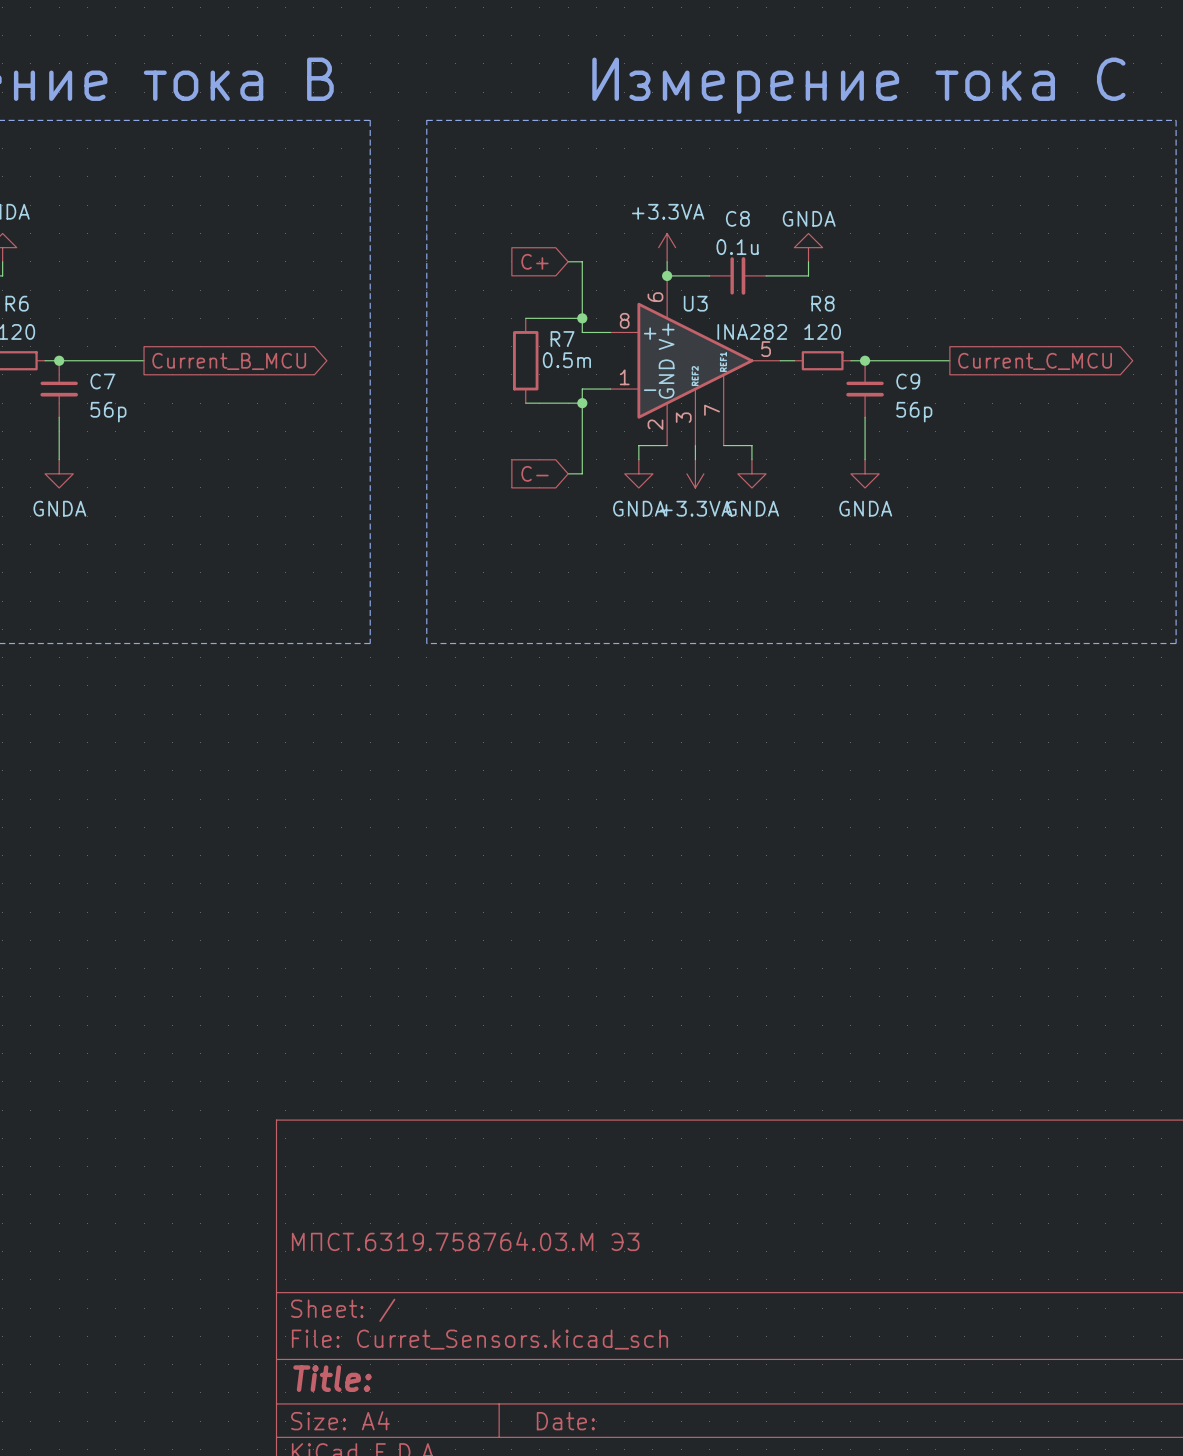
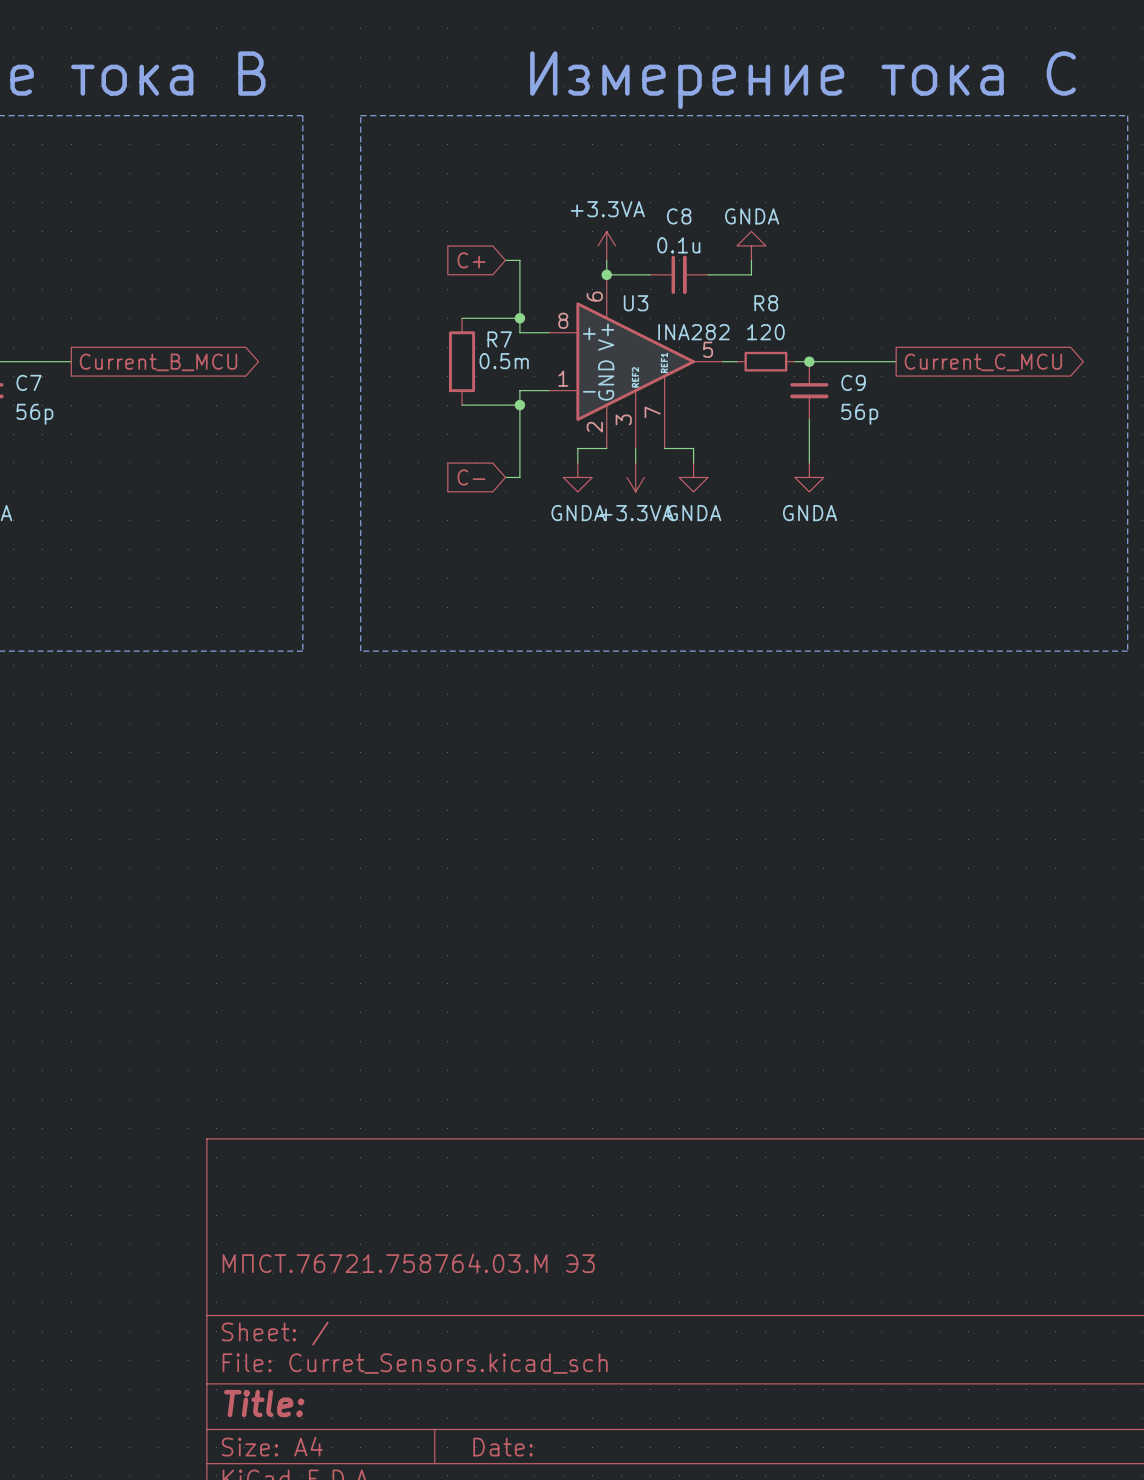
title block: МПСТ.6319.758764.03.М Э3 (465, 1241) -> МПСТ.76721.758764.03.М Э3 (408, 1263)

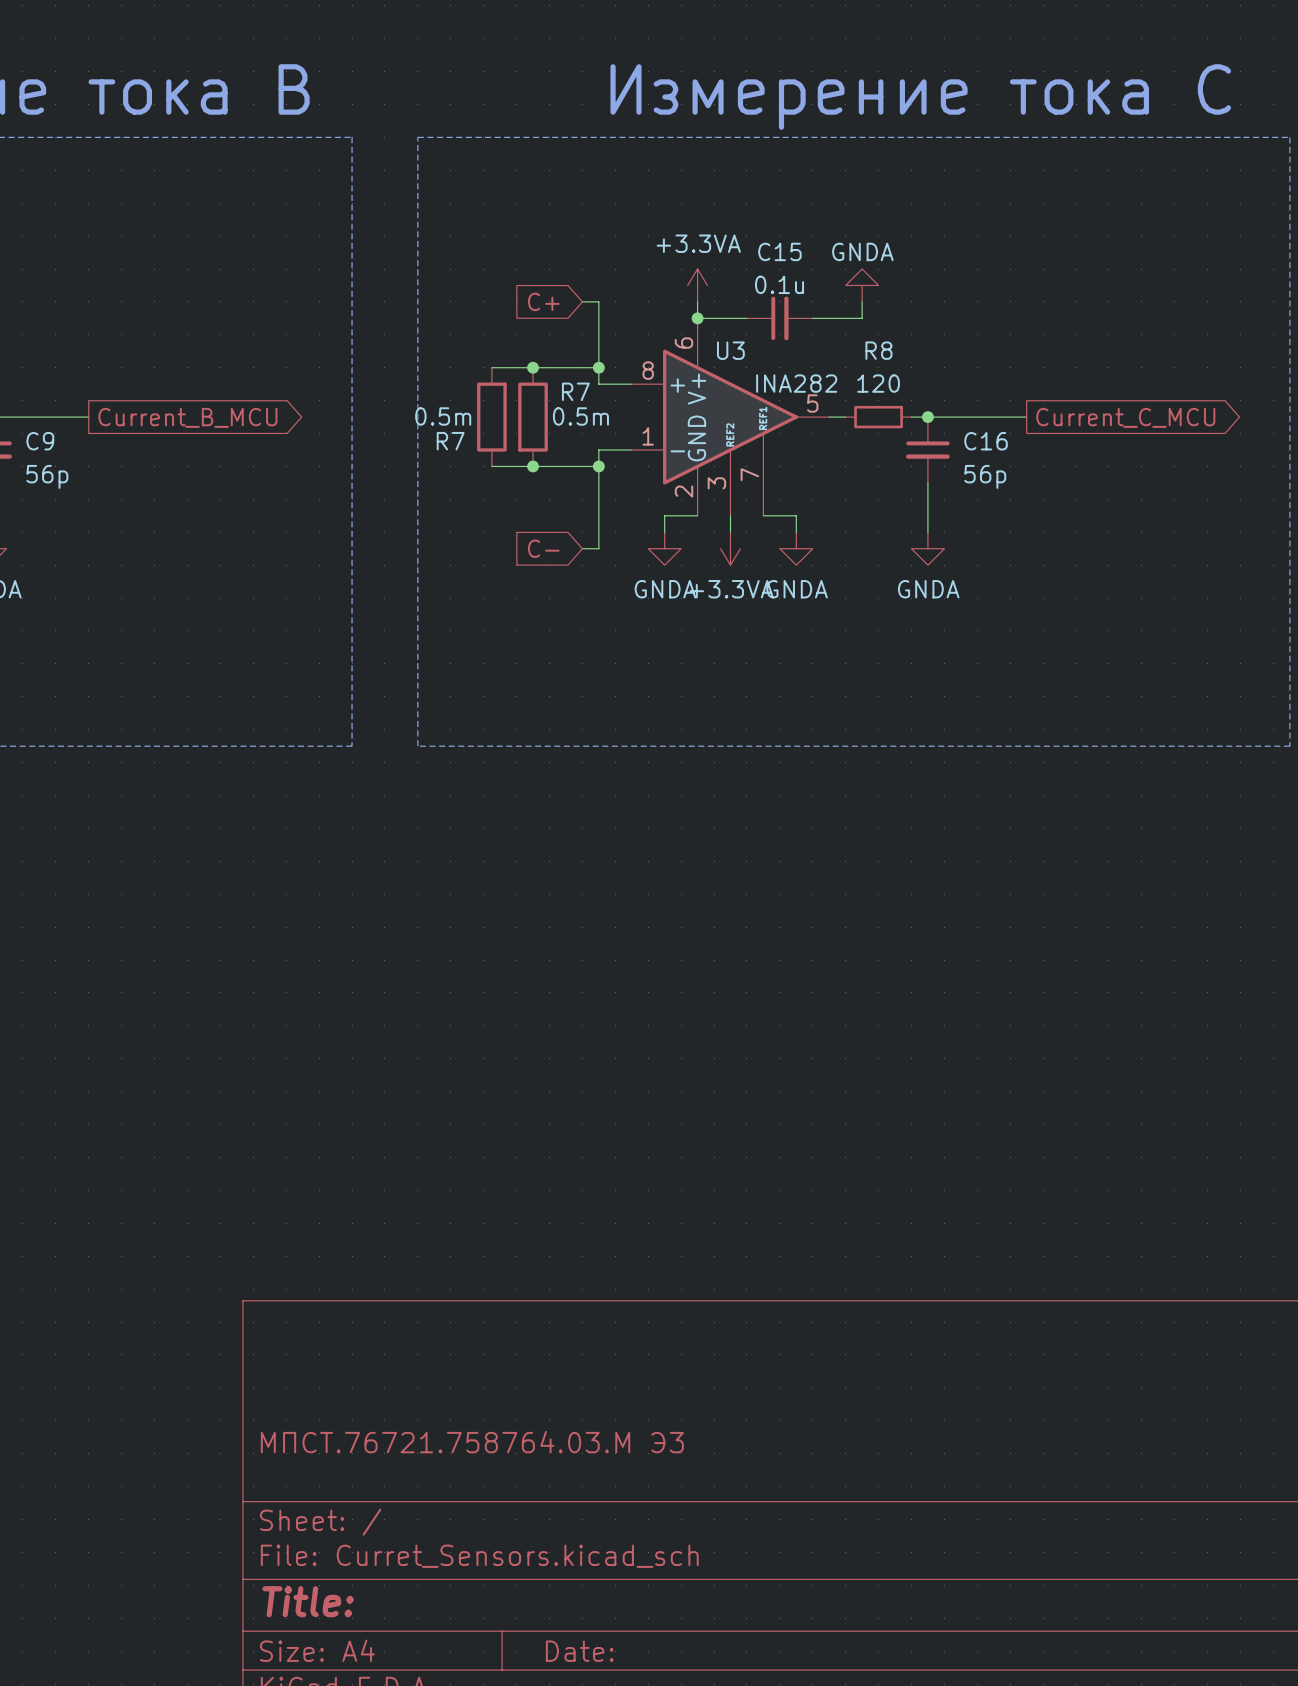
C8 name: C8 (679, 216) -> C15 (779, 251)
wire: none -> (491, 367) (533, 367)
junction: none -> (533, 367)
R7: none -> 0.5m (491, 417)
C7 name: C7 (29, 382) -> C9 (40, 441)
C9 name: C9 (853, 382) -> C16 (986, 441)
wire: none -> (491, 466) (533, 466)
junction: none -> (533, 466)

